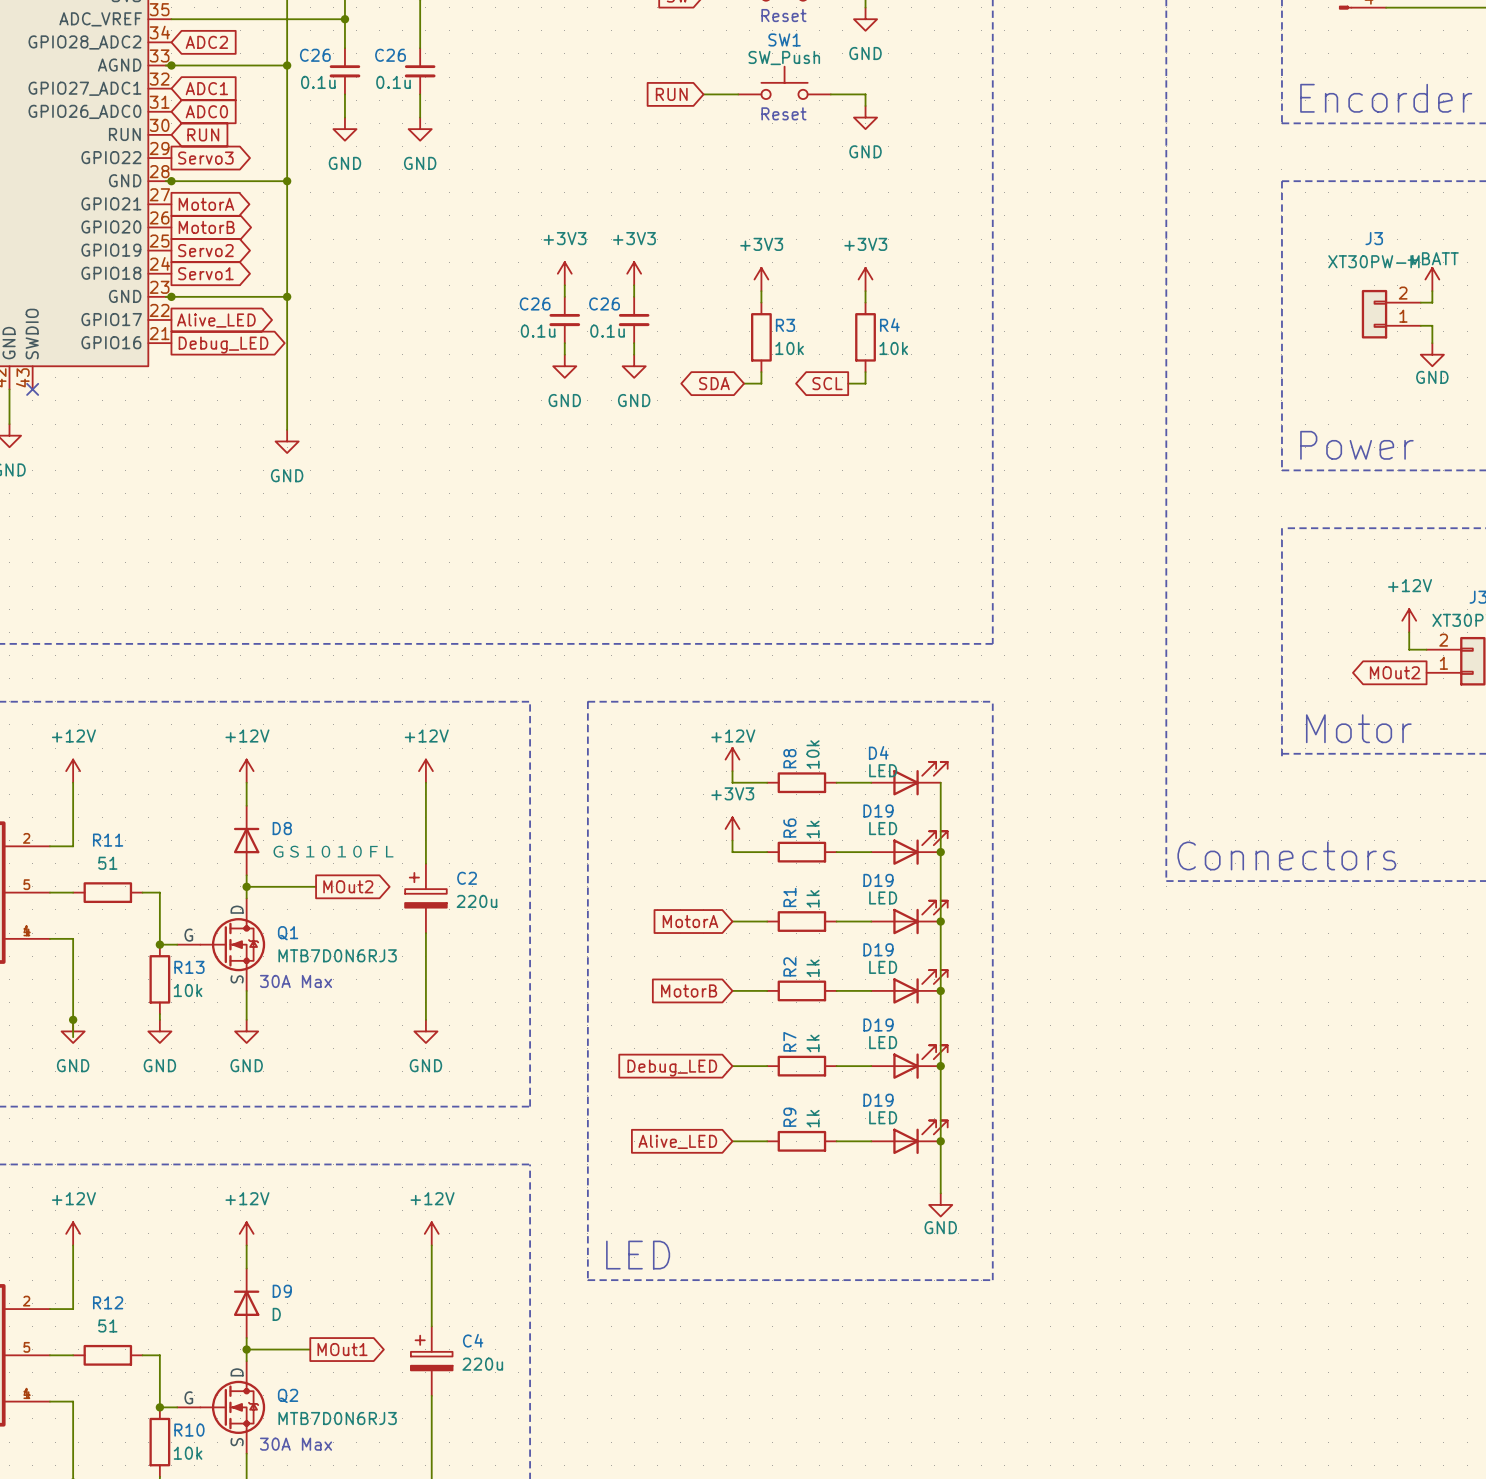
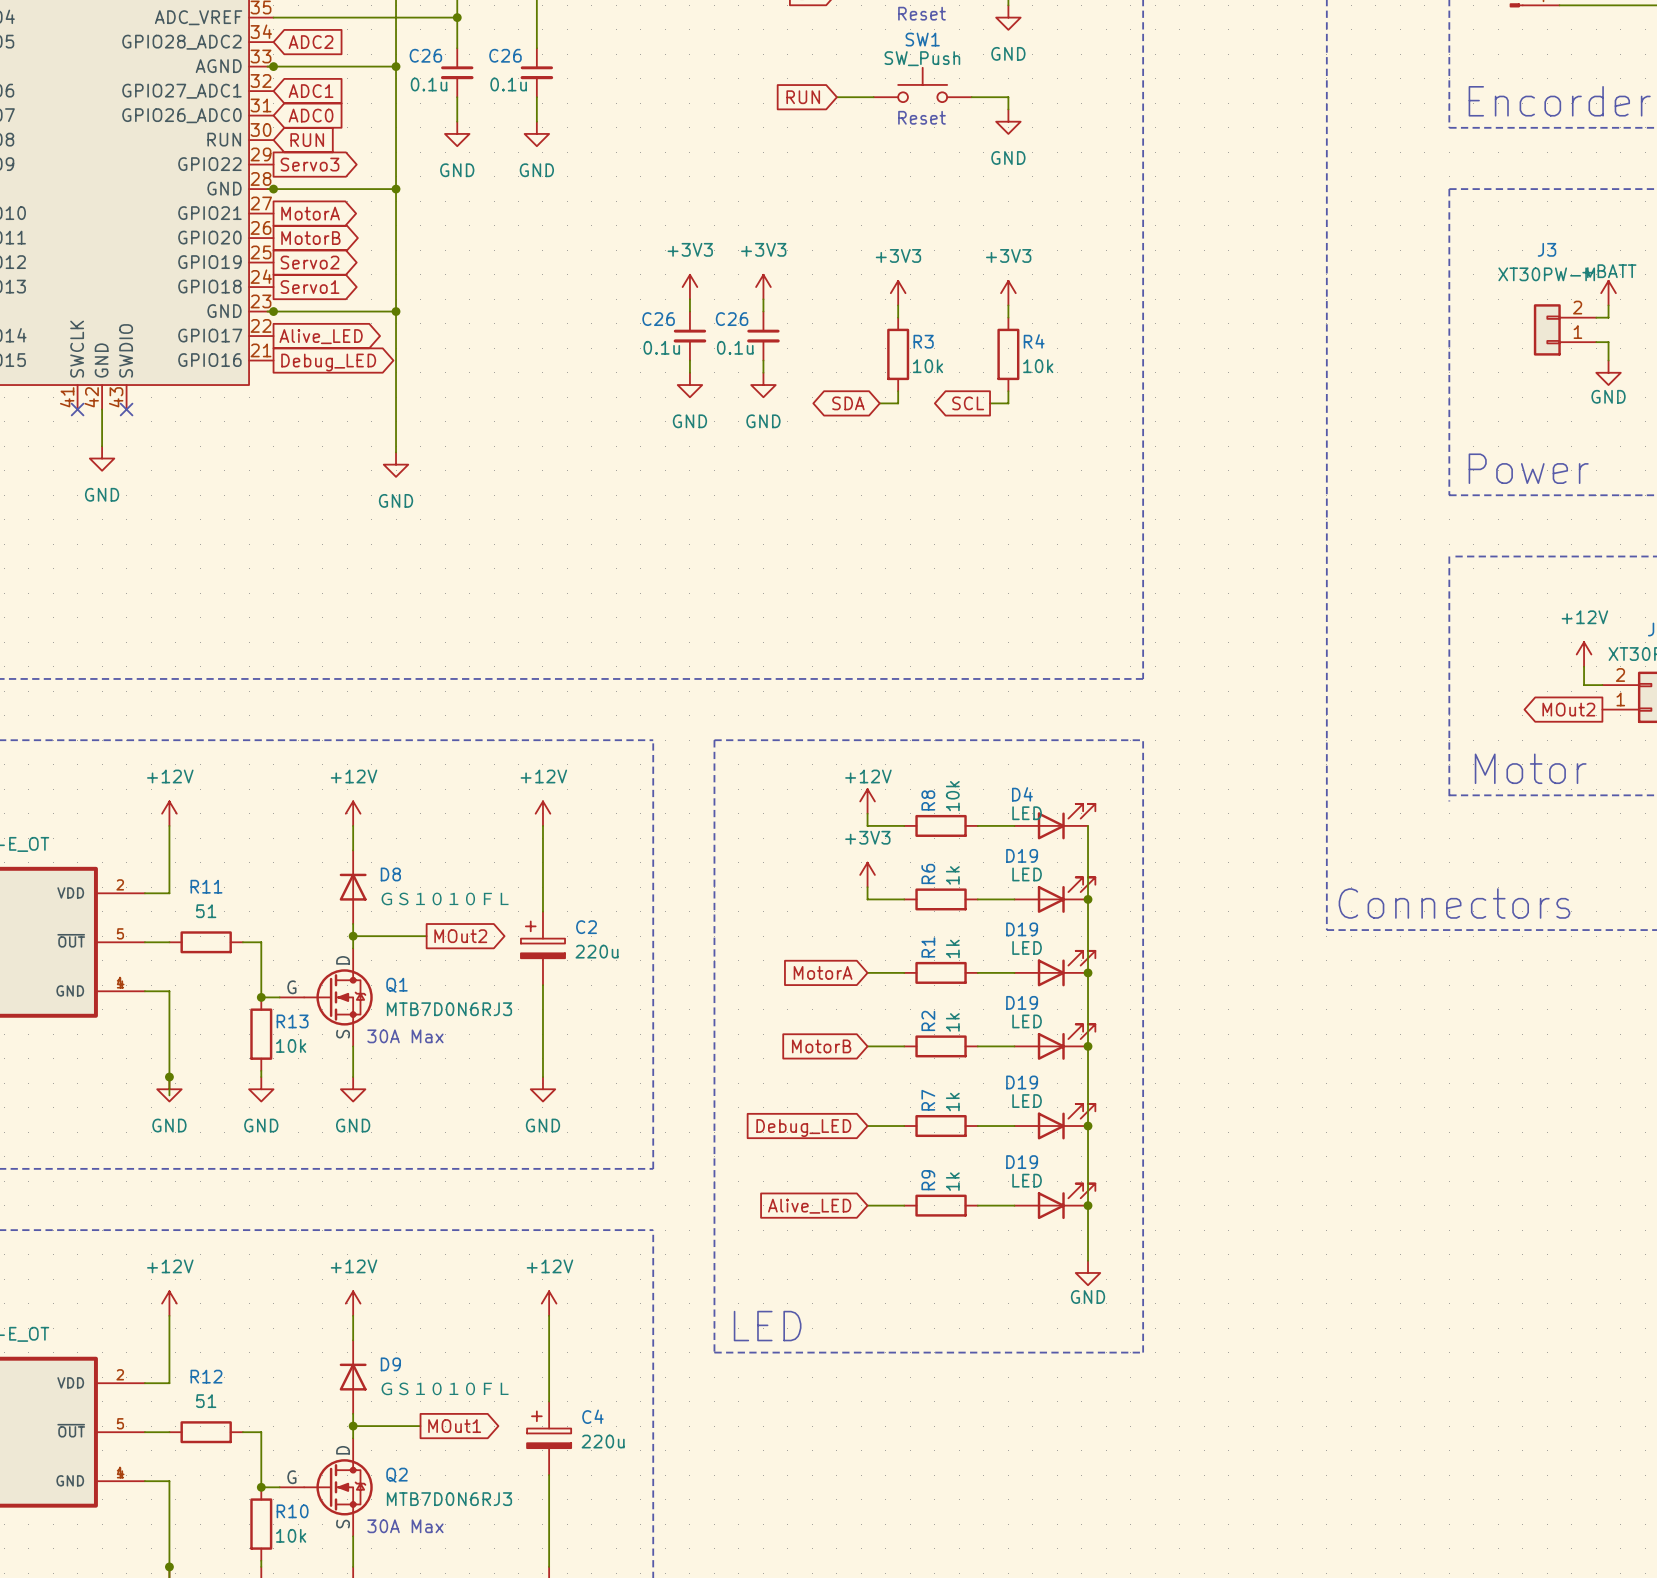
D9 value: D (276, 1314) -> ＧＳ１０１０ＦＬ (445, 1388)

